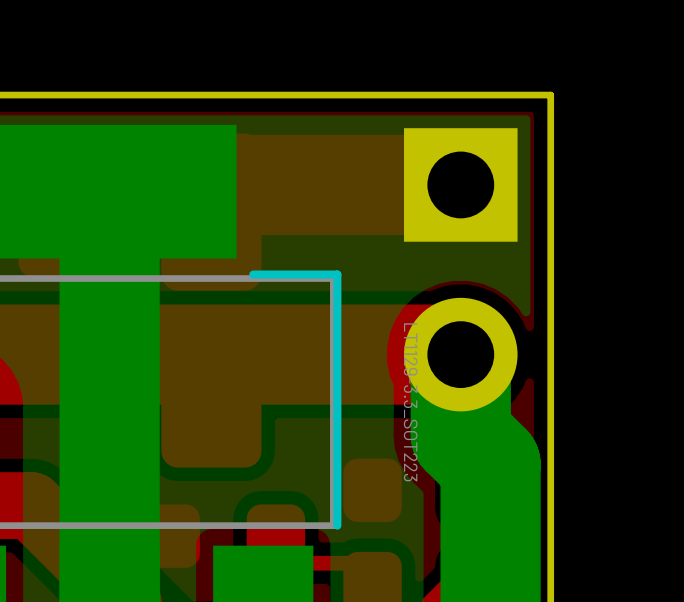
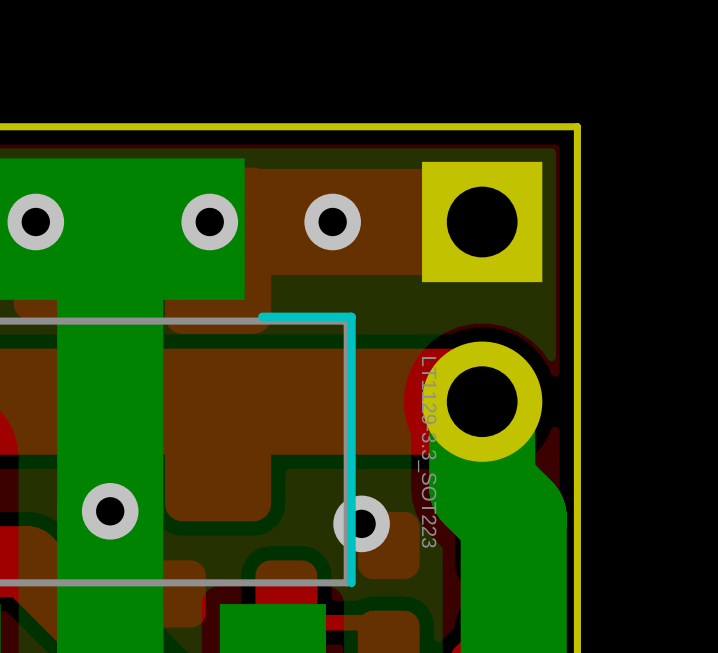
via: none -> (35, 221)
via: none -> (209, 221)
via: none -> (332, 221)
via: none -> (110, 511)
via: none -> (361, 523)

